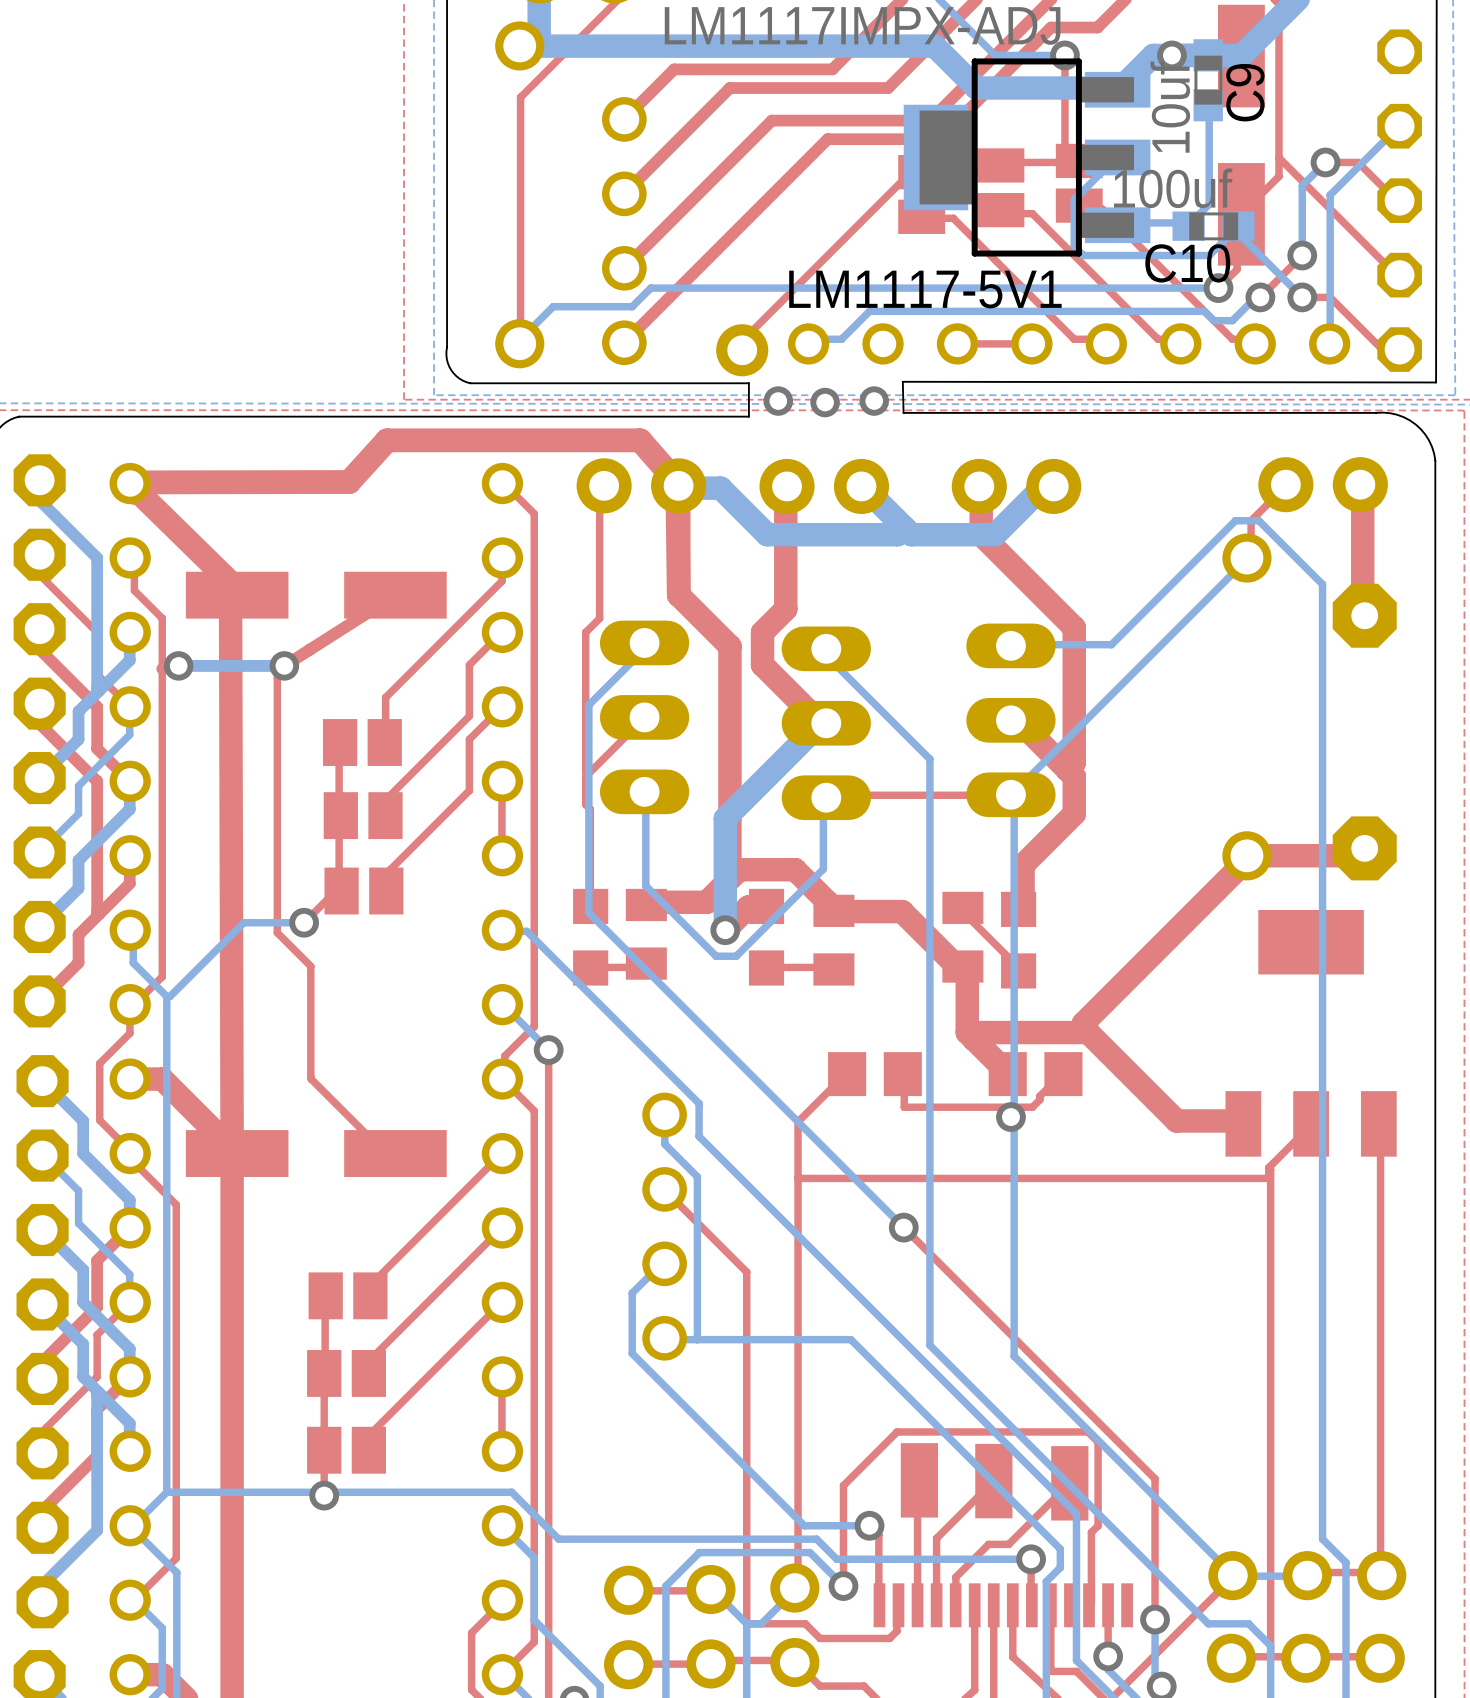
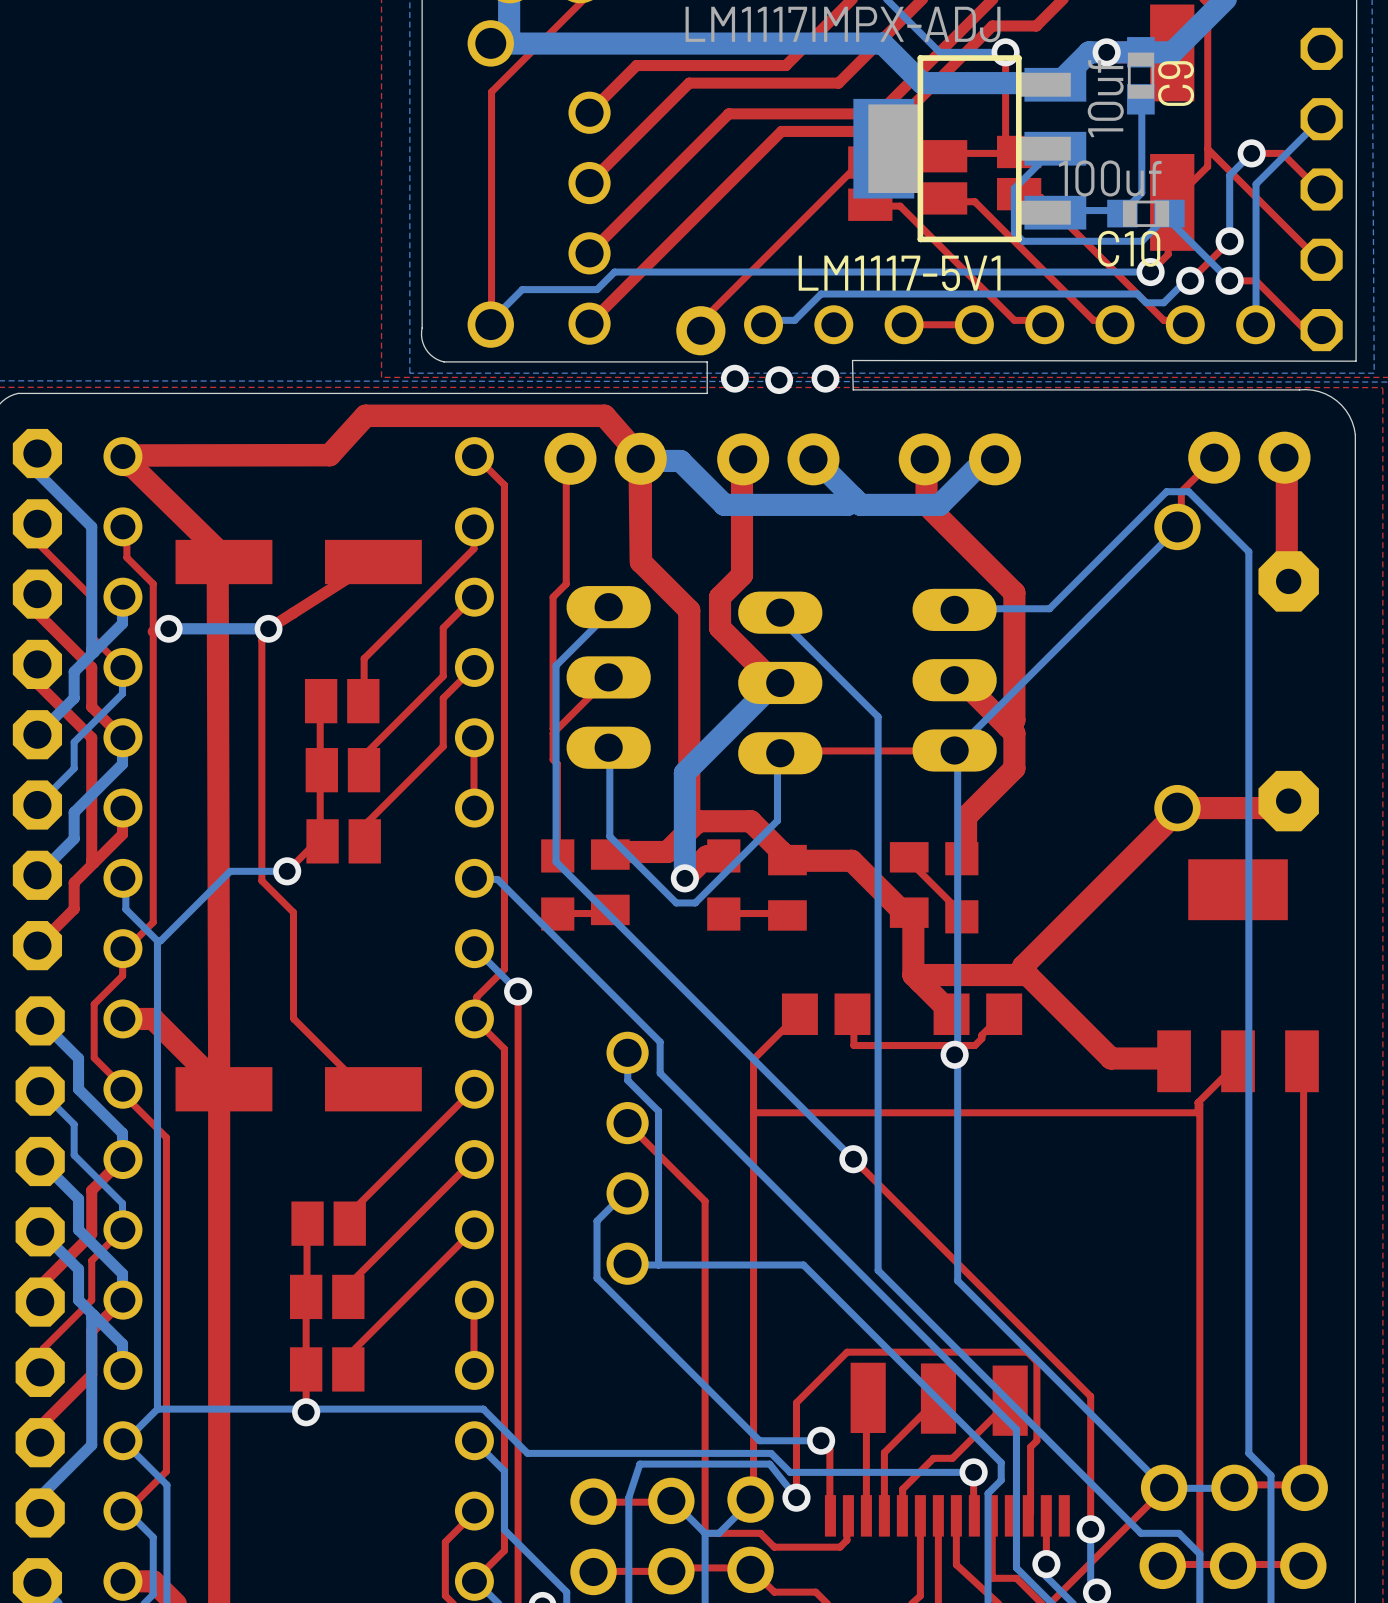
bottom track: (843, 1586) (809, 1552) (699, 1552) (665, 1586) -> (796, 1497) (769, 1464) (639, 1464) (628, 1497)

